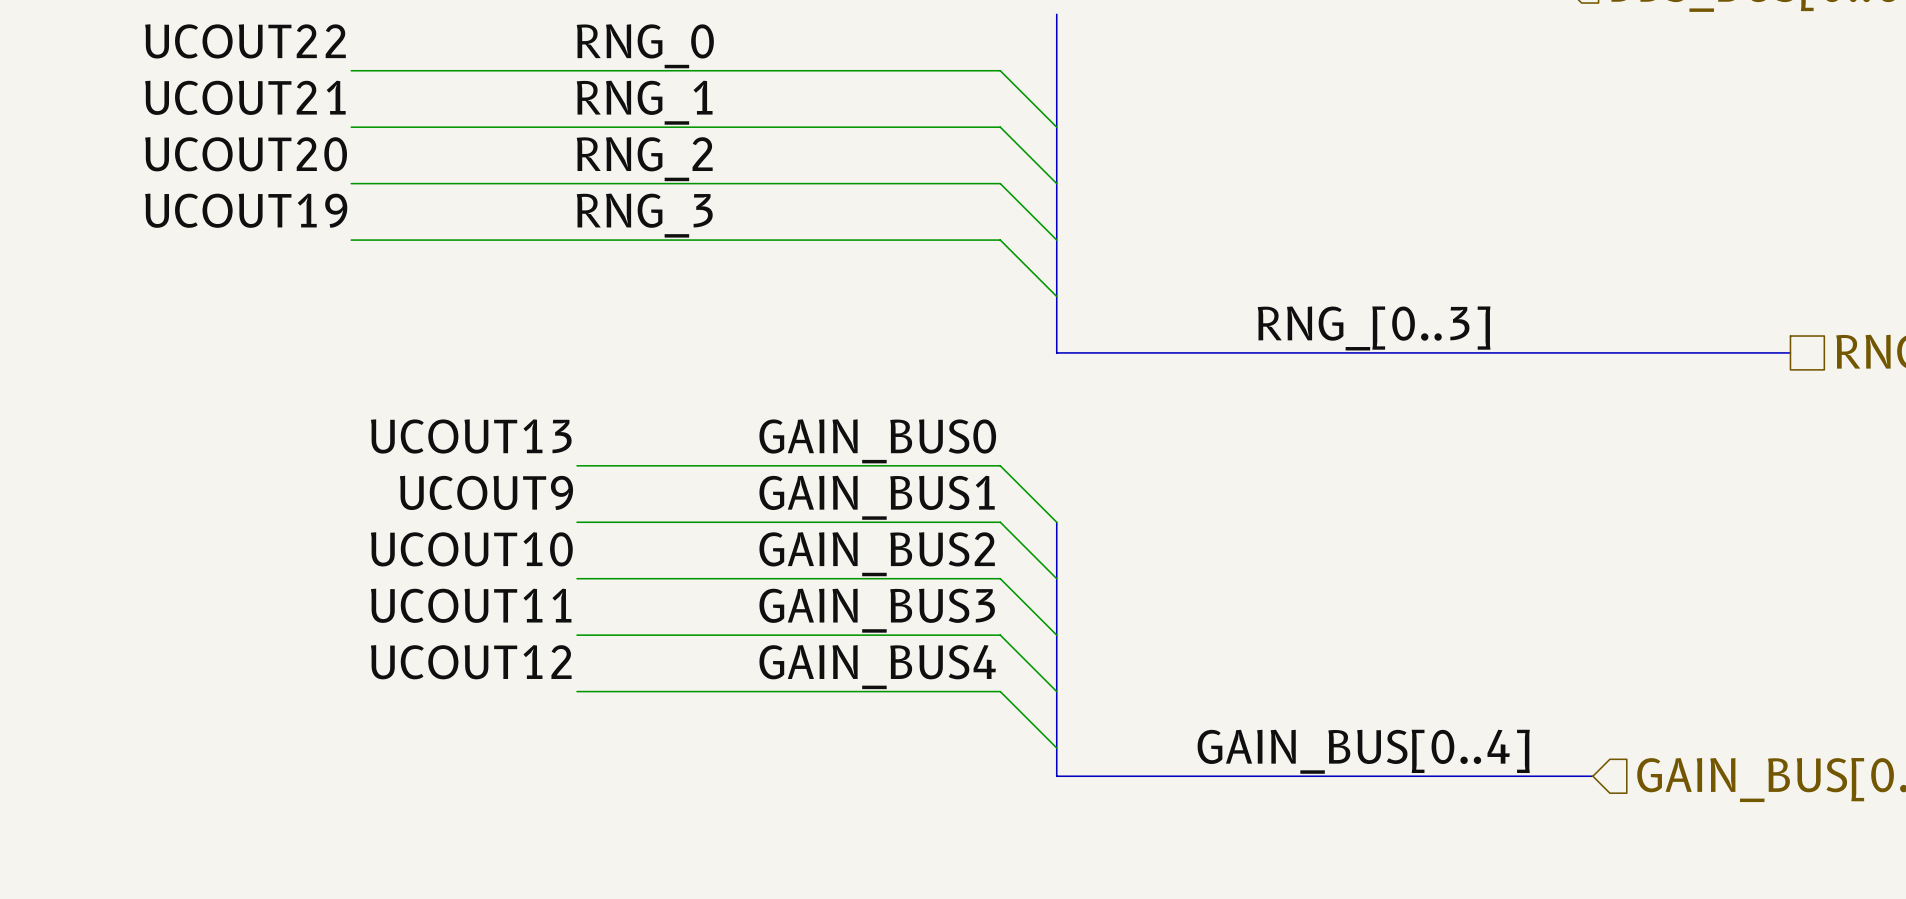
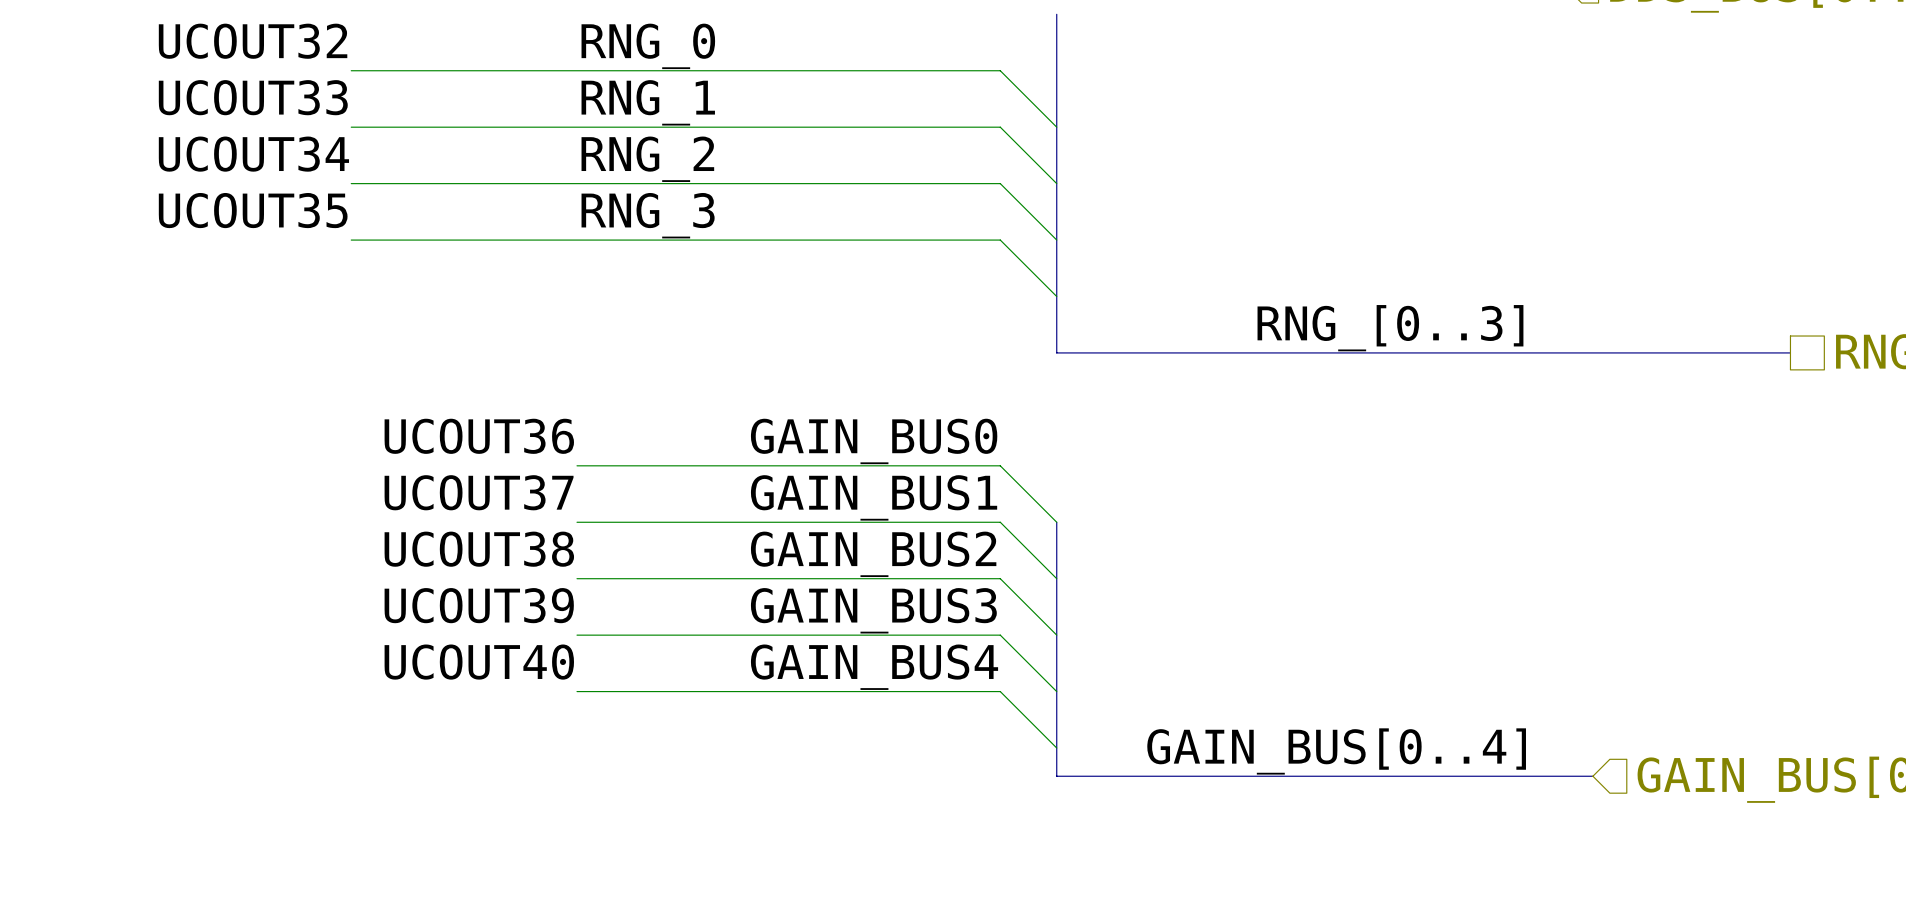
label: UCOUT22 (245, 41) -> UCOUT32 (253, 41)
label: UCOUT21 (245, 97) -> UCOUT33 (253, 97)
label: UCOUT20 (246, 154) -> UCOUT34 (253, 154)
label: UCOUT19 (246, 210) -> UCOUT35 (253, 210)
label: UCOUT13 (471, 436) -> UCOUT36 (479, 436)
label: UCOUT9 (486, 492) -> UCOUT37 (479, 492)
label: UCOUT10 (471, 549) -> UCOUT38 (479, 549)
label: UCOUT11 (471, 605) -> UCOUT39 (479, 605)
label: UCOUT12 (471, 662) -> UCOUT40 (479, 662)

